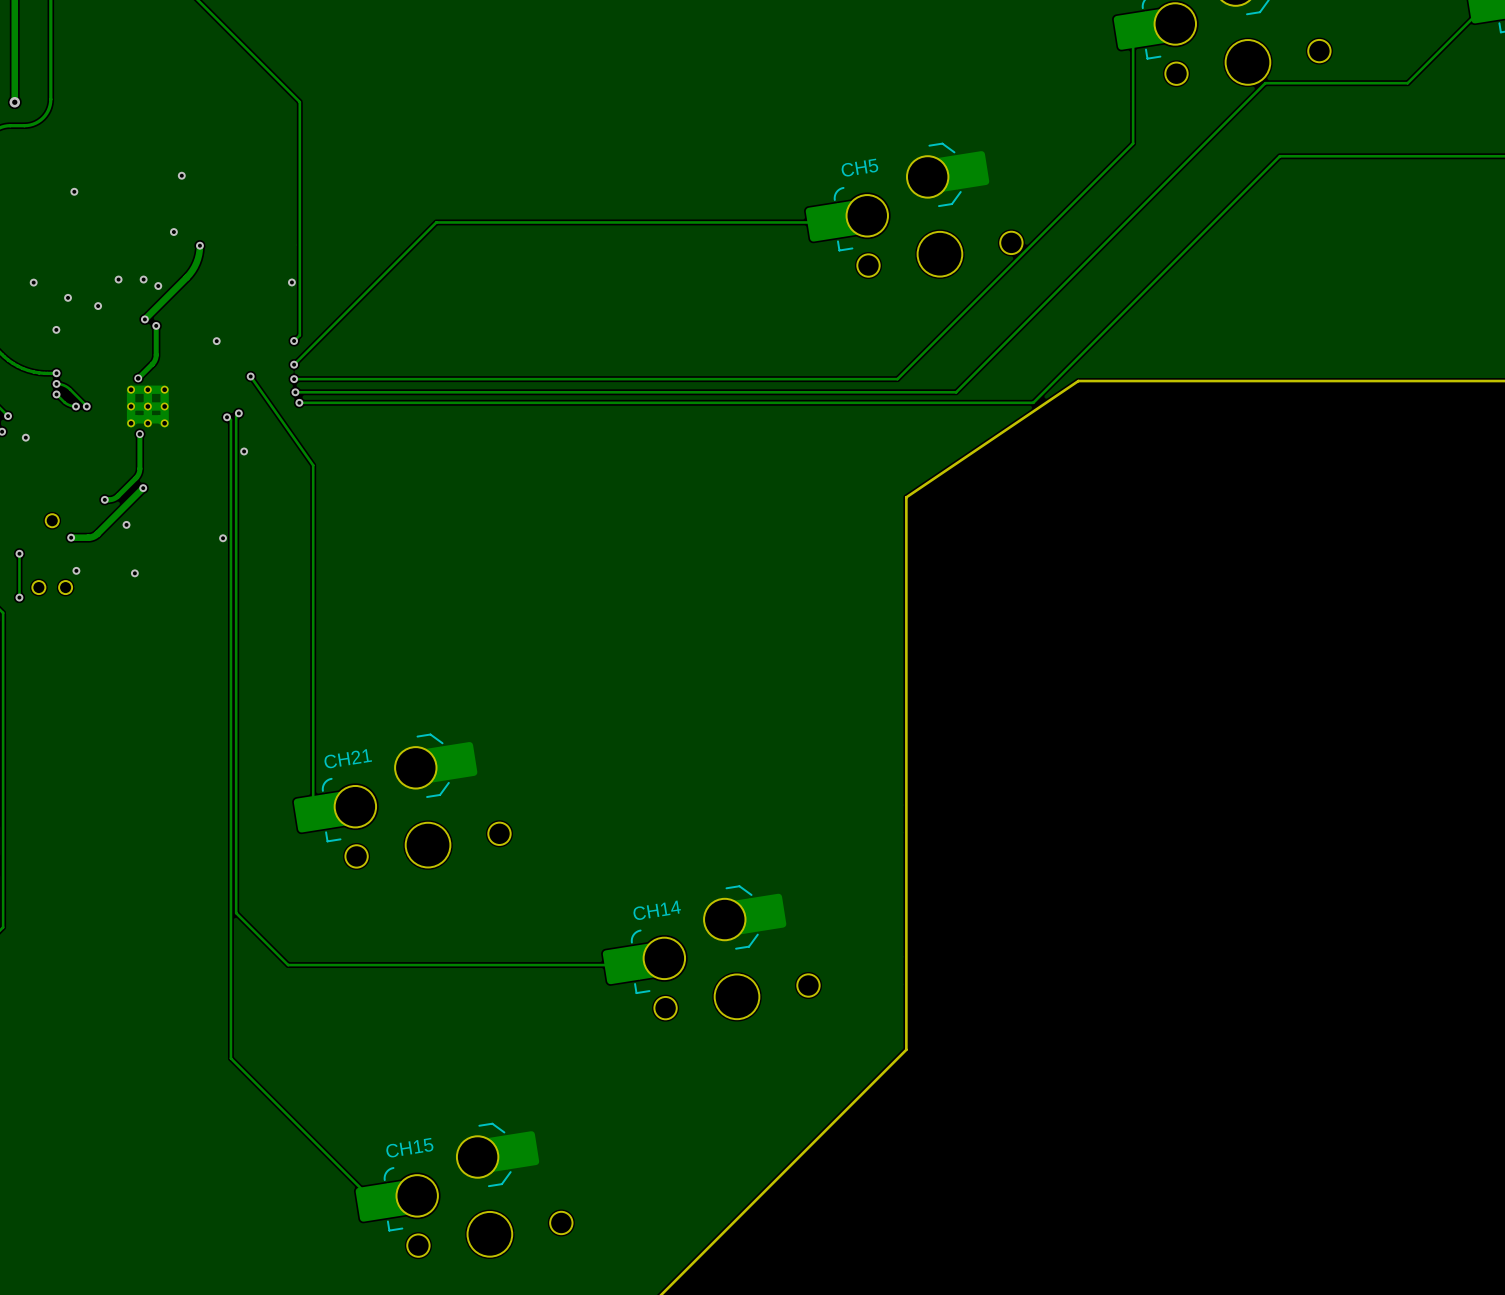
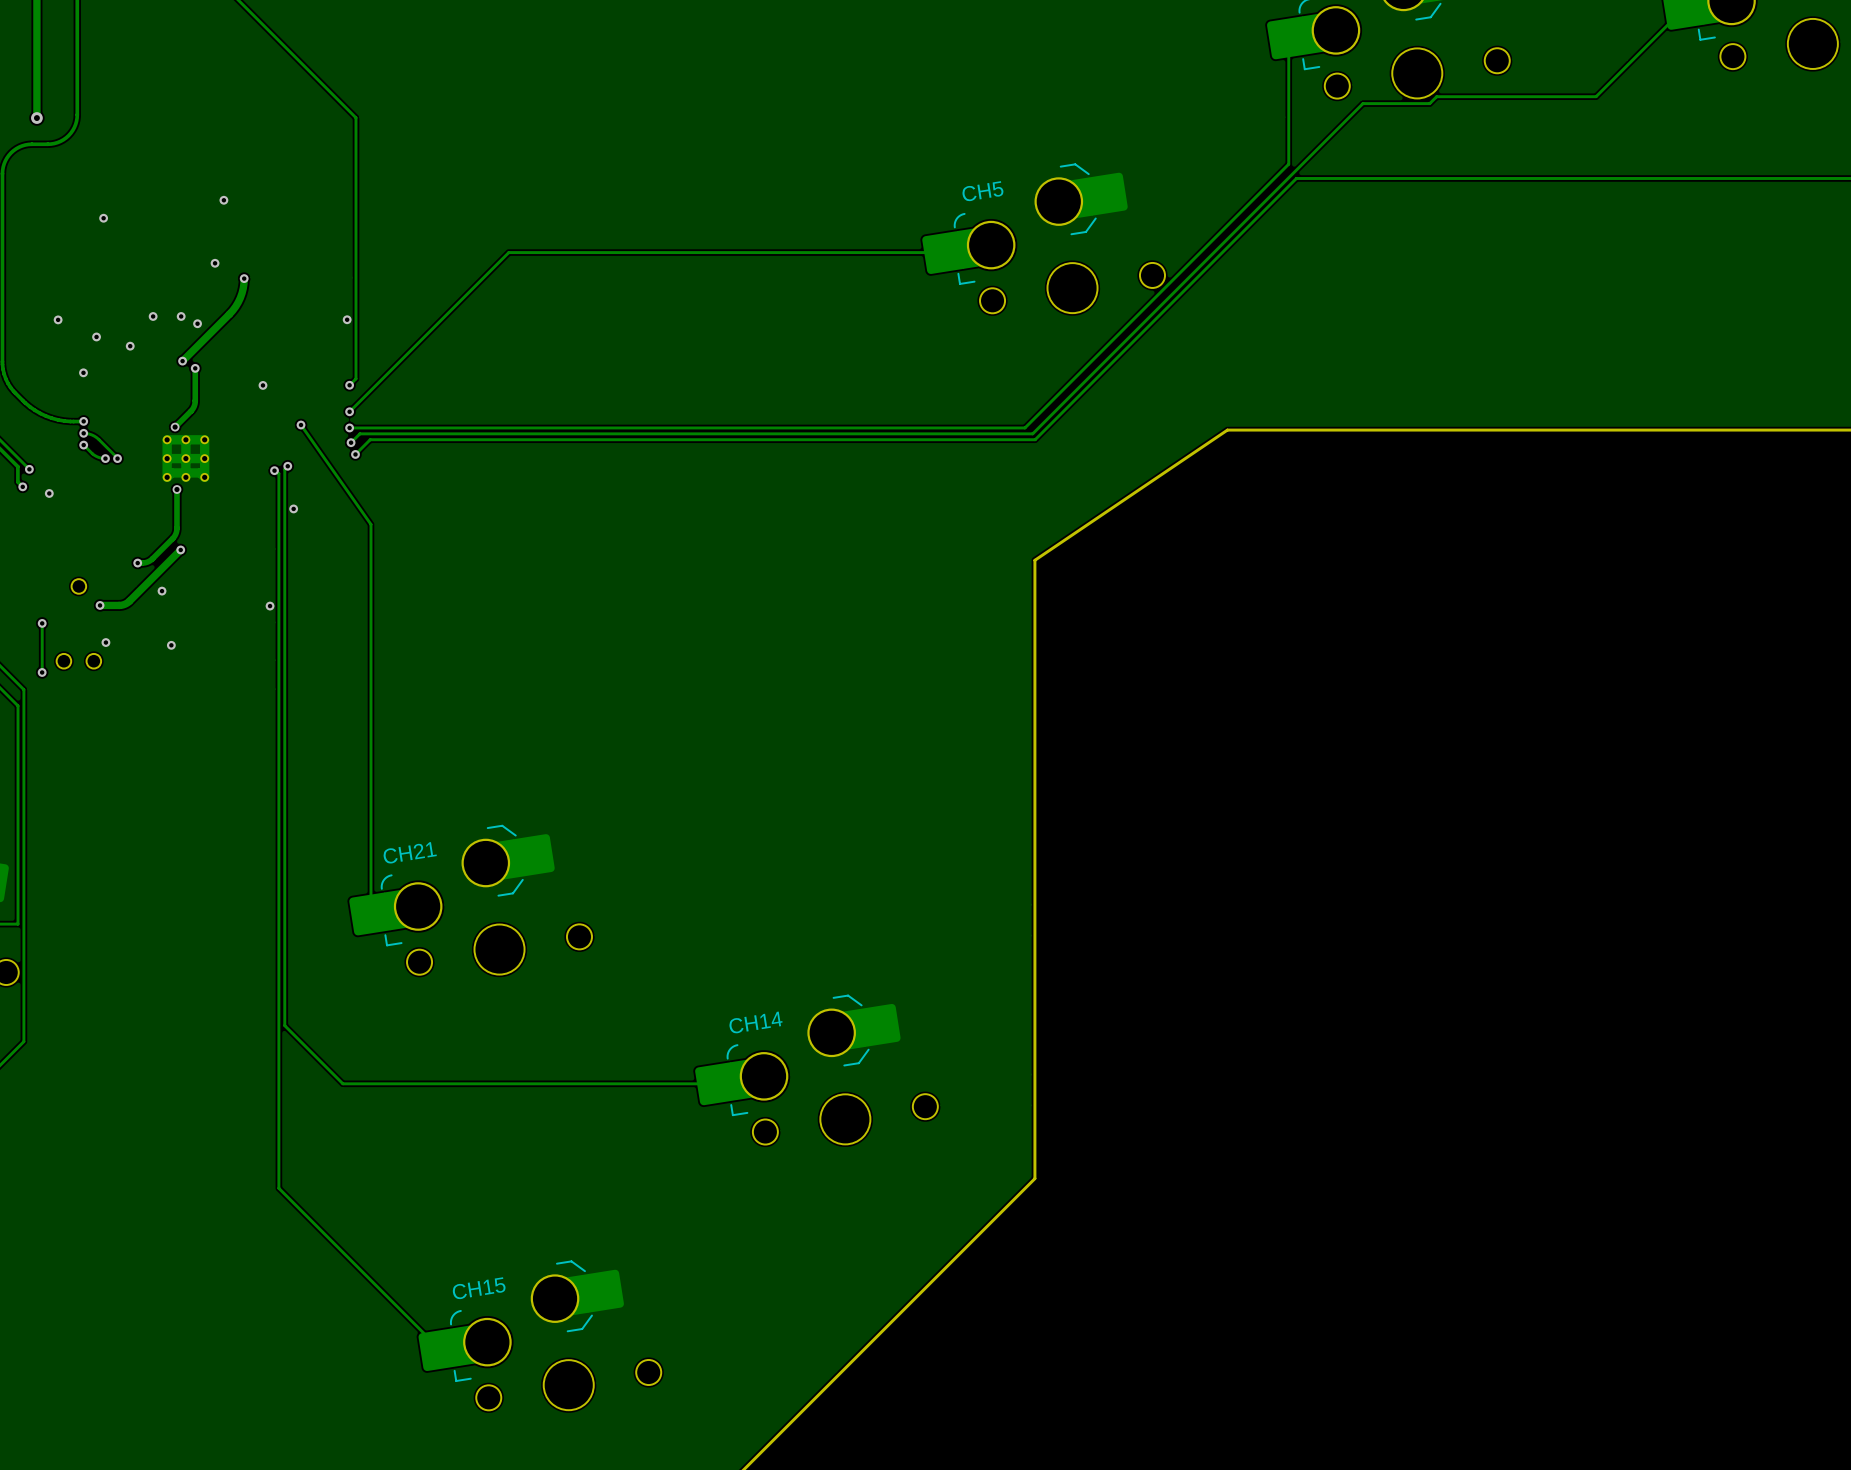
track: (1259, 89) (956, 392) (295, 392) -> (1429, 103) (1362, 103) (1032, 433) (359, 433) (351, 442)
track: (1279, 156) (1033, 402) (299, 402) -> (1452, 178) (1296, 178) (1035, 439) (370, 439) (355, 454)

